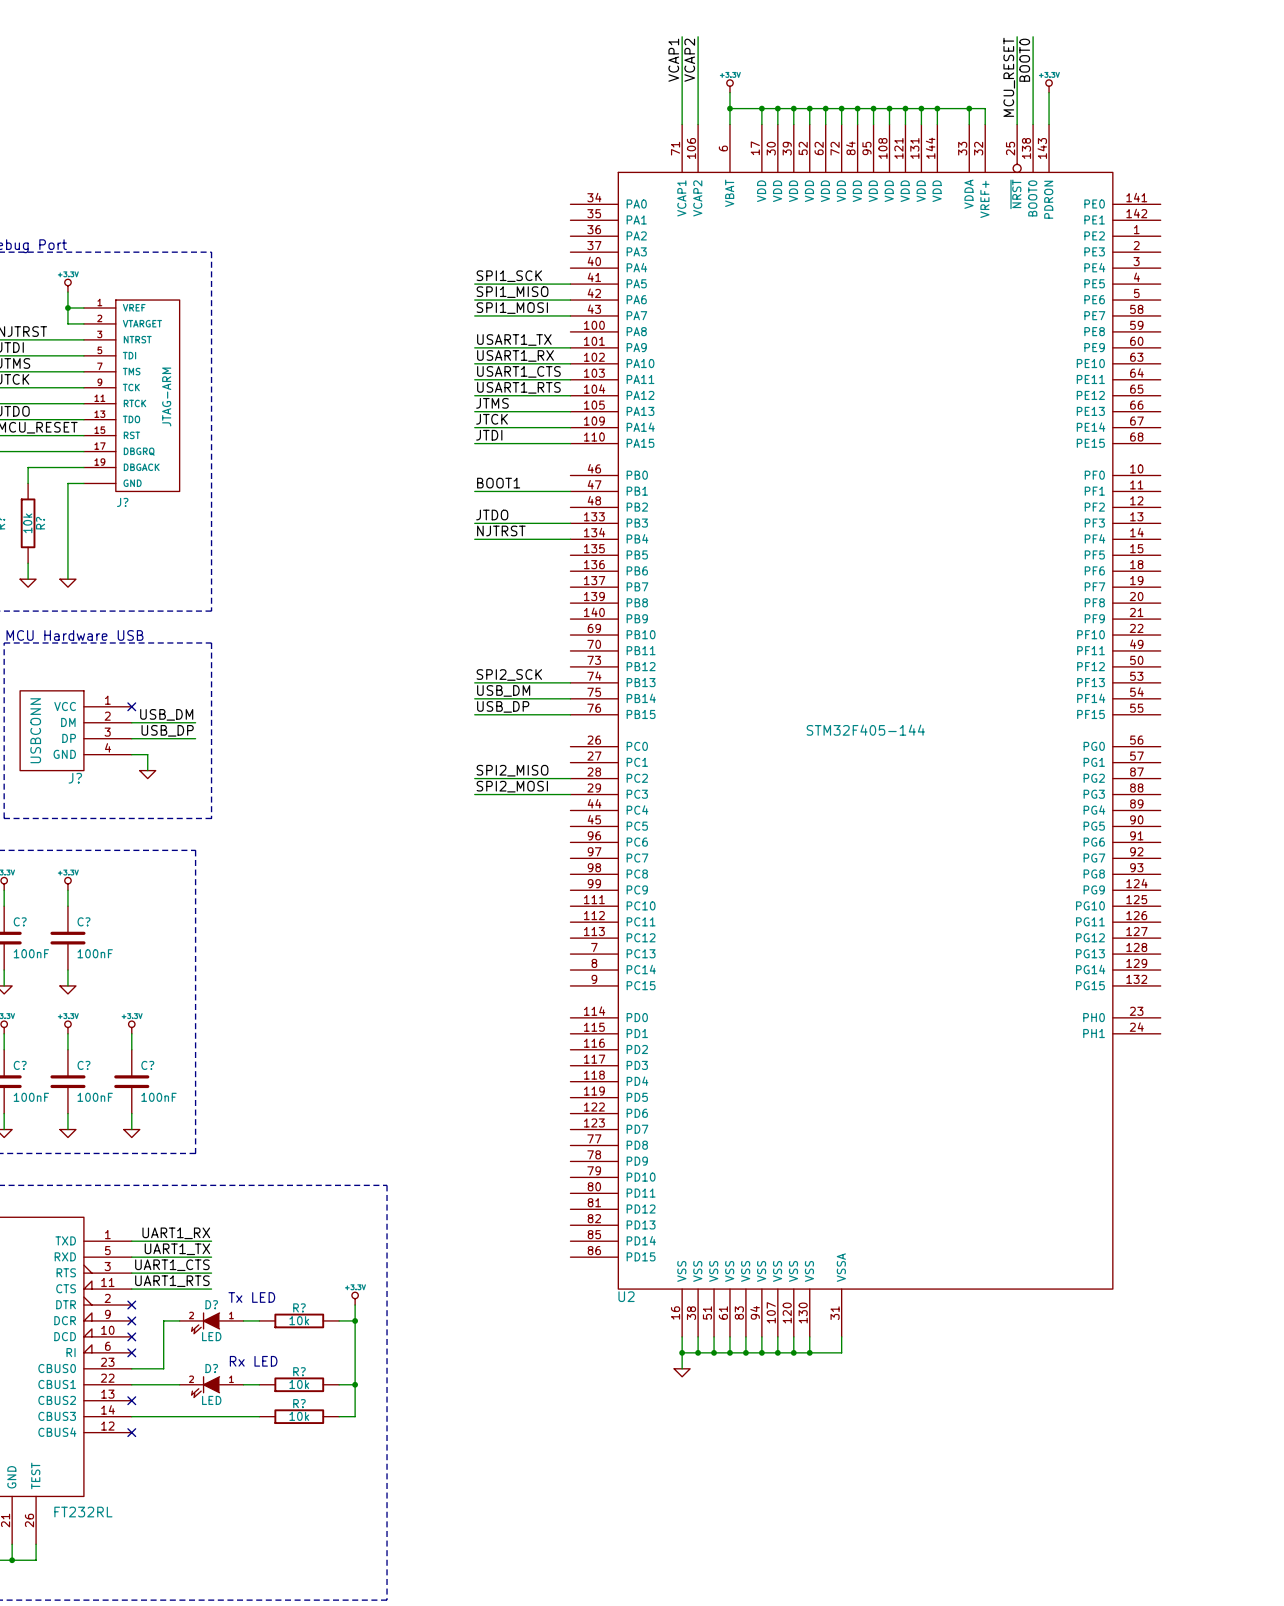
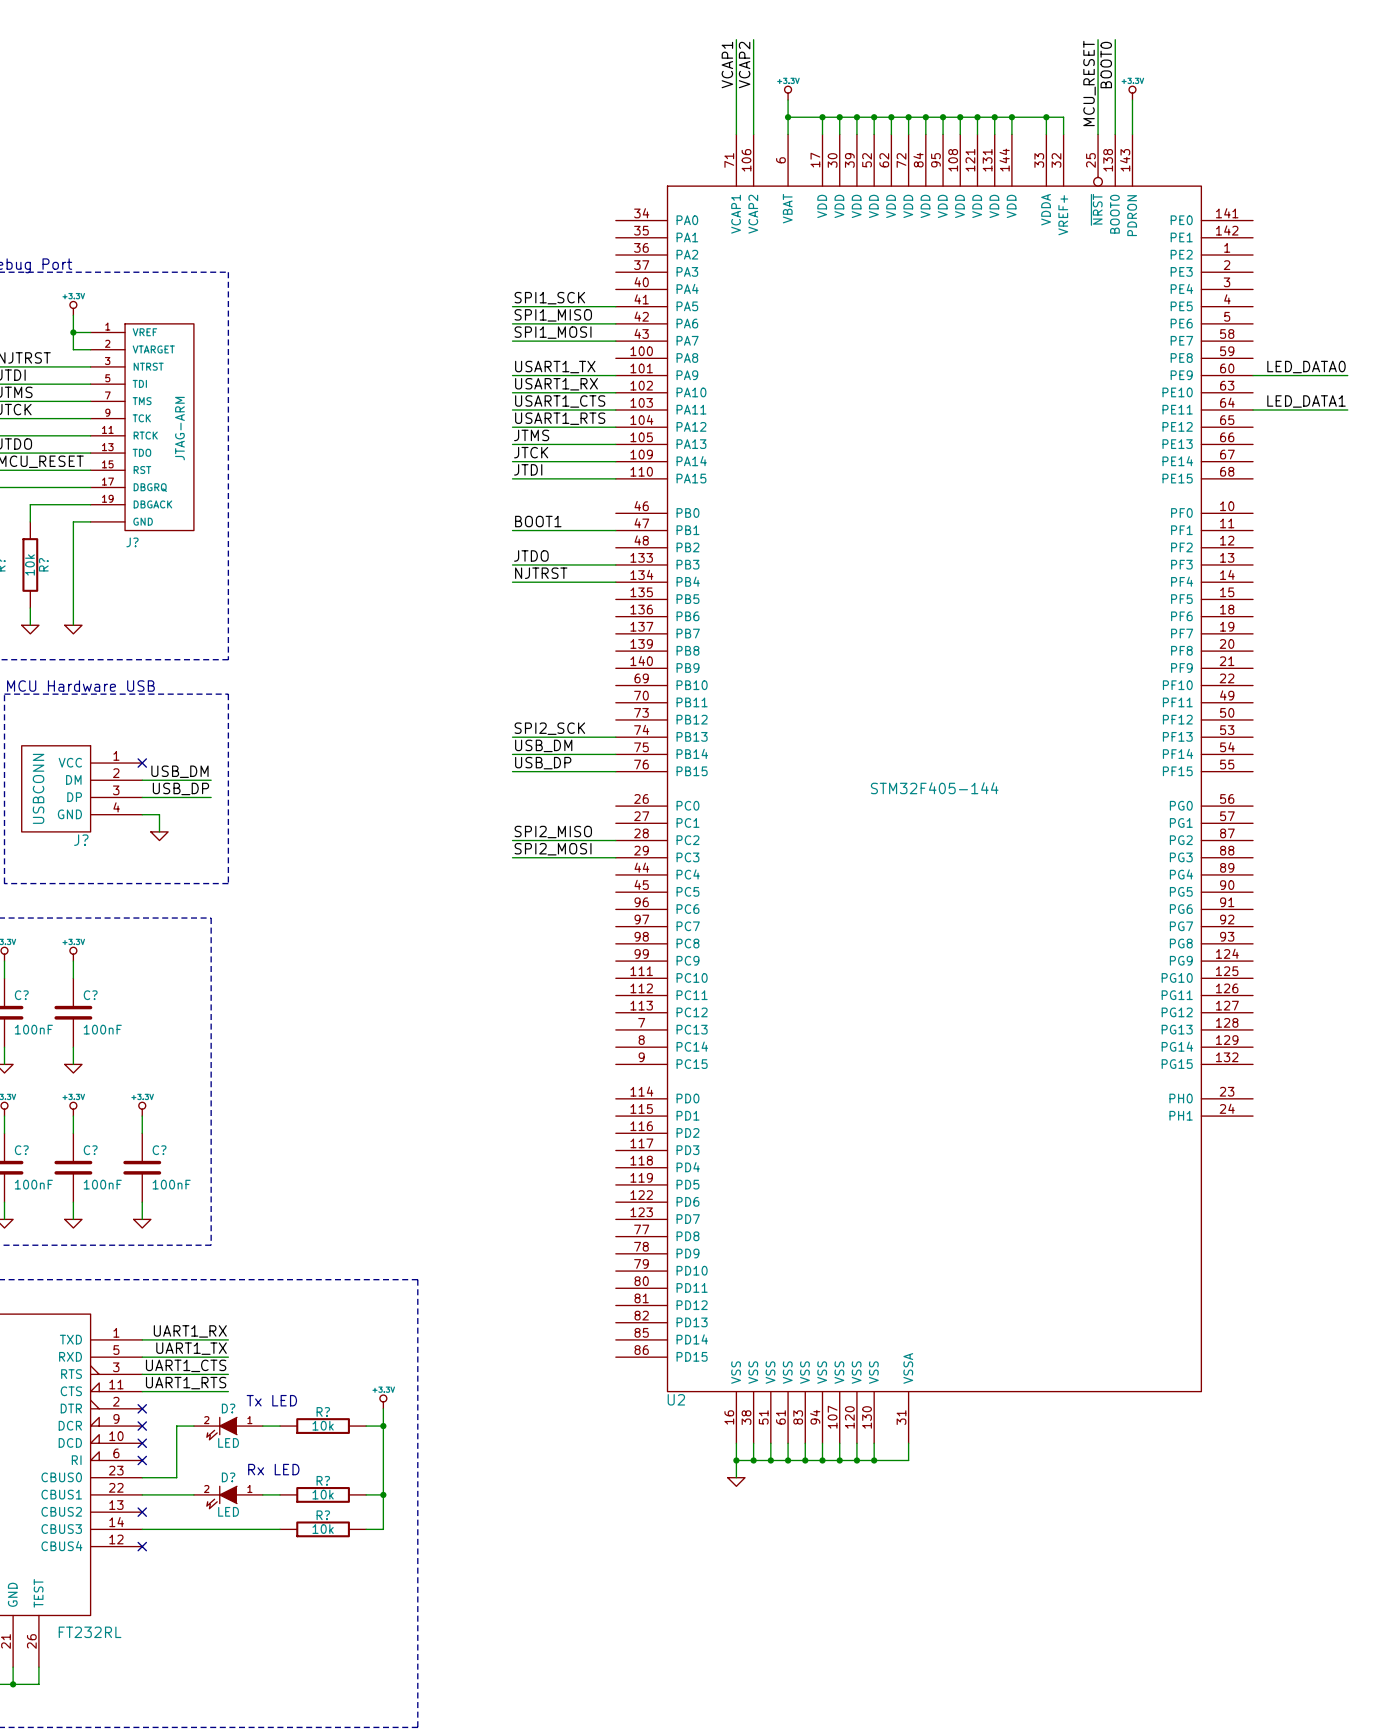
label: none -> LED_DATA0 (1306, 367)
wire: none -> (1253, 375) (1347, 375)
label: none -> LED_DATA1 (1306, 401)
wire: none -> (1253, 409) (1347, 409)

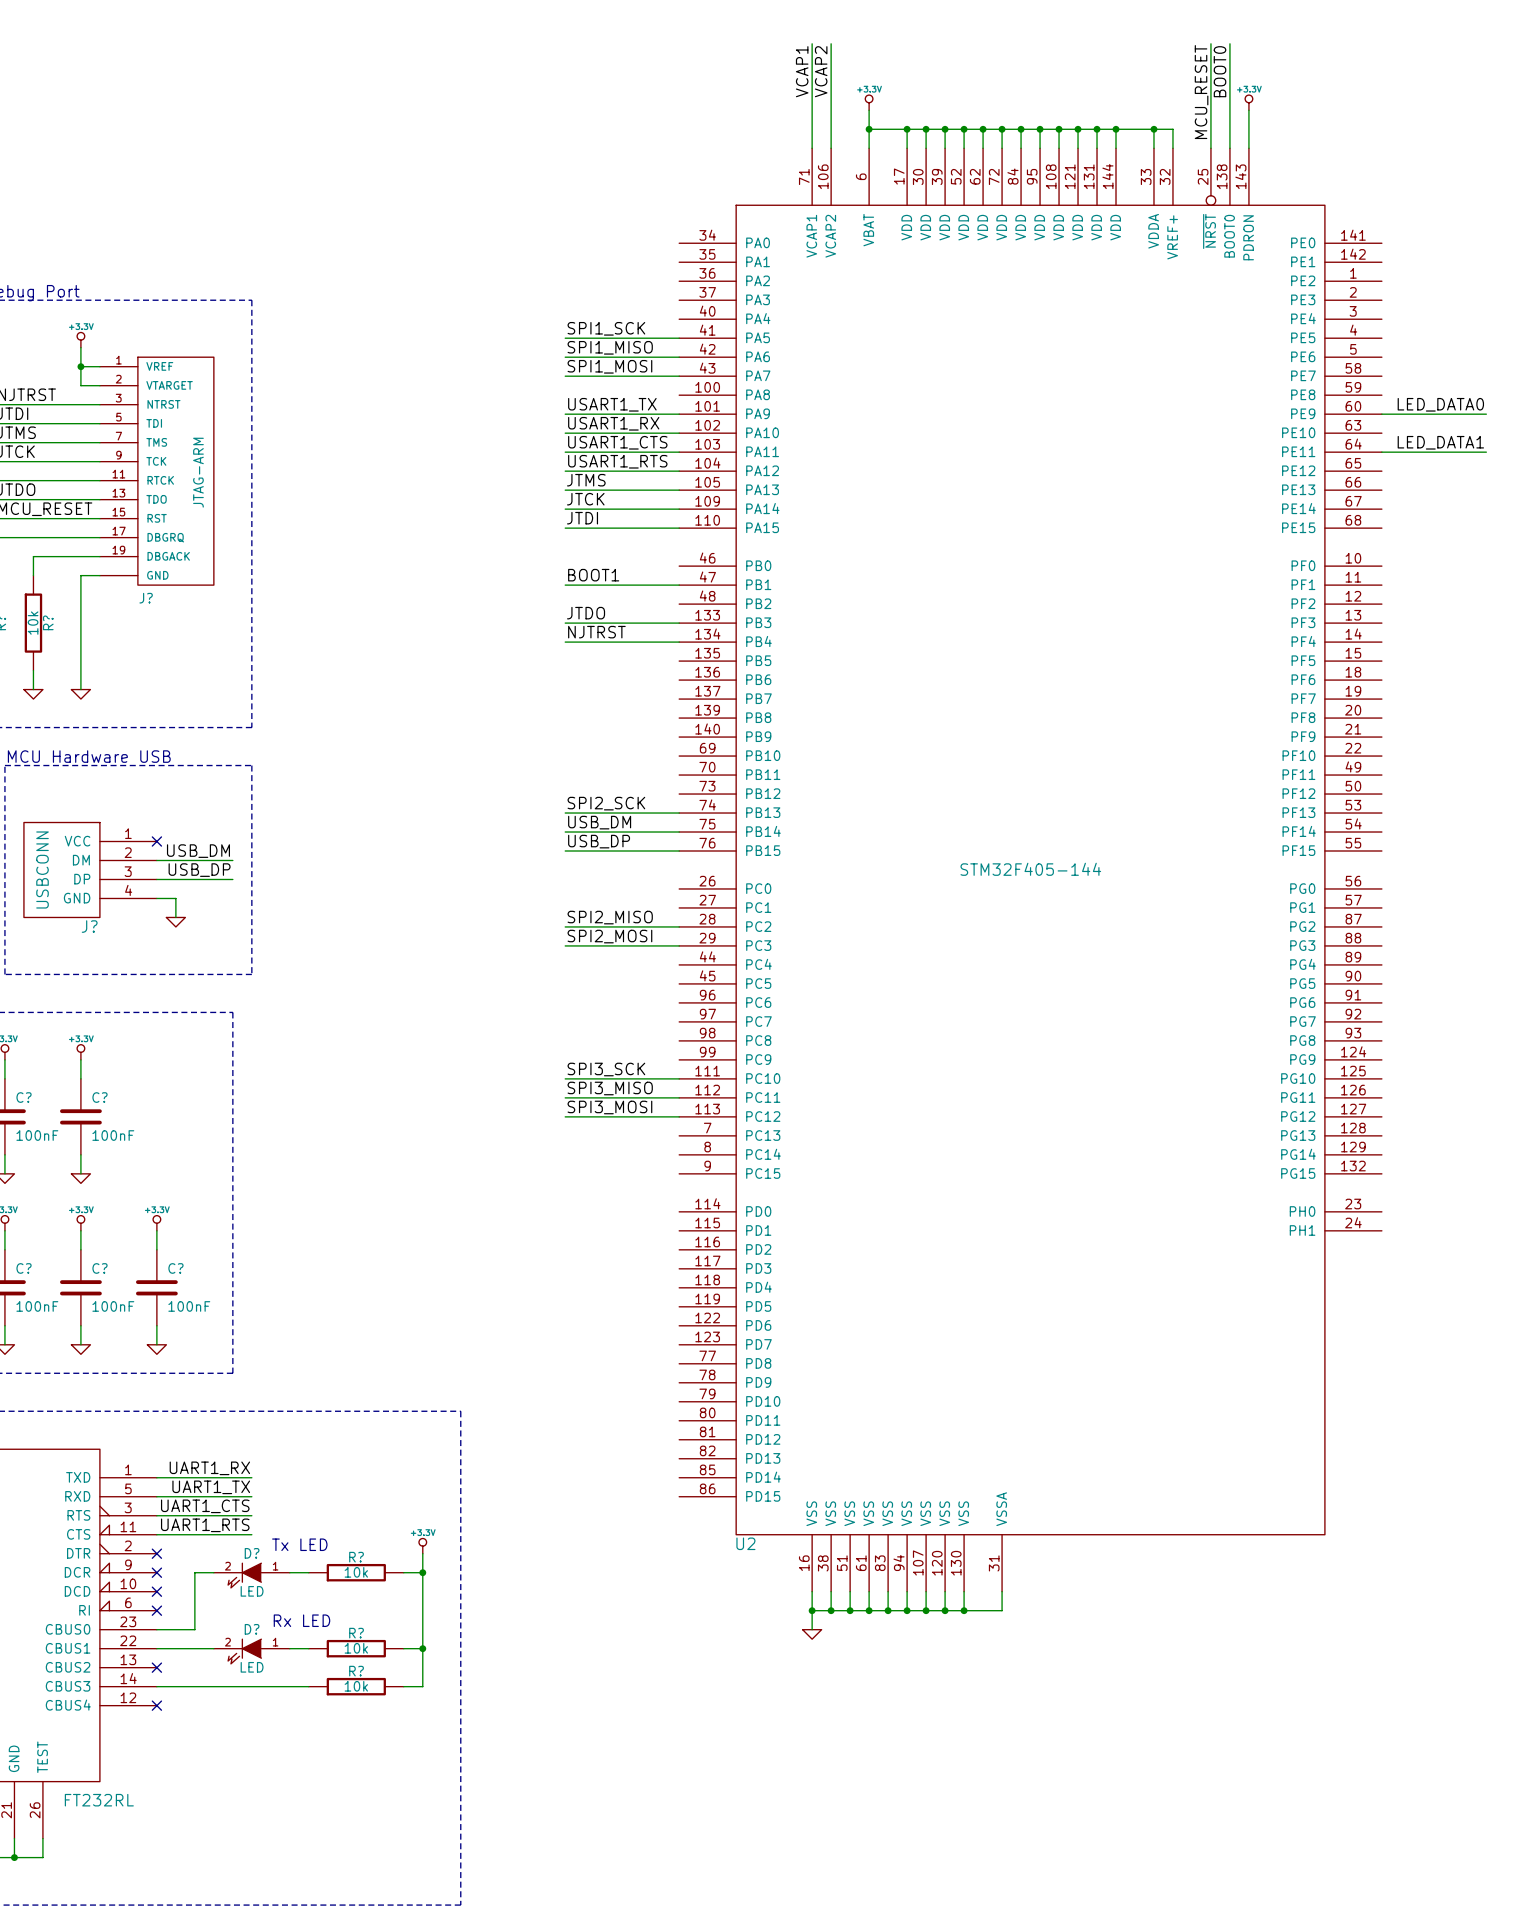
label: none -> SPI3_SCK (606, 1069)
wire: none -> (565, 1078) (679, 1078)
label: none -> SPI3_MISO (610, 1088)
wire: none -> (565, 1097) (679, 1097)
label: none -> SPI3_MOSI (609, 1107)
wire: none -> (565, 1116) (679, 1116)

